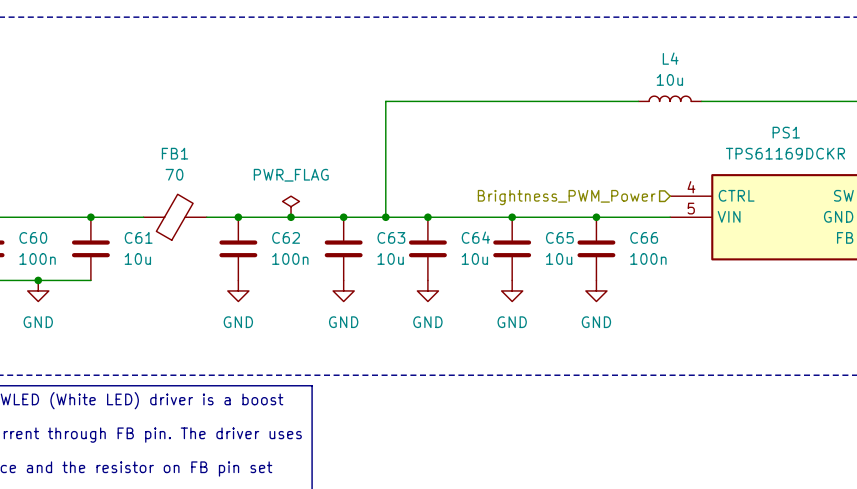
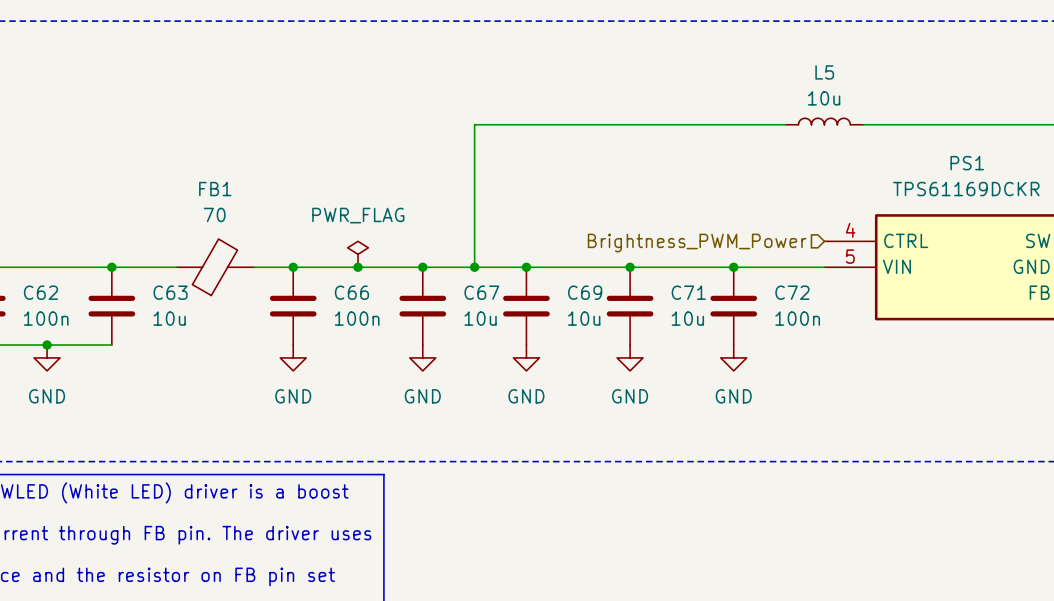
L4 name: L4 (670, 58) -> L5 (824, 72)
C60 name: C60 (33, 237) -> C62 (40, 292)
C61 name: C61 (138, 237) -> C63 (170, 292)
C62 name: C62 (286, 237) -> C66 (351, 292)
C63 name: C63 (391, 237) -> C67 (481, 292)
C64 name: C64 (475, 237) -> C69 (585, 292)
C65 name: C65 (559, 237) -> C71 (688, 292)
C66 name: C66 (644, 237) -> C72 (792, 292)

